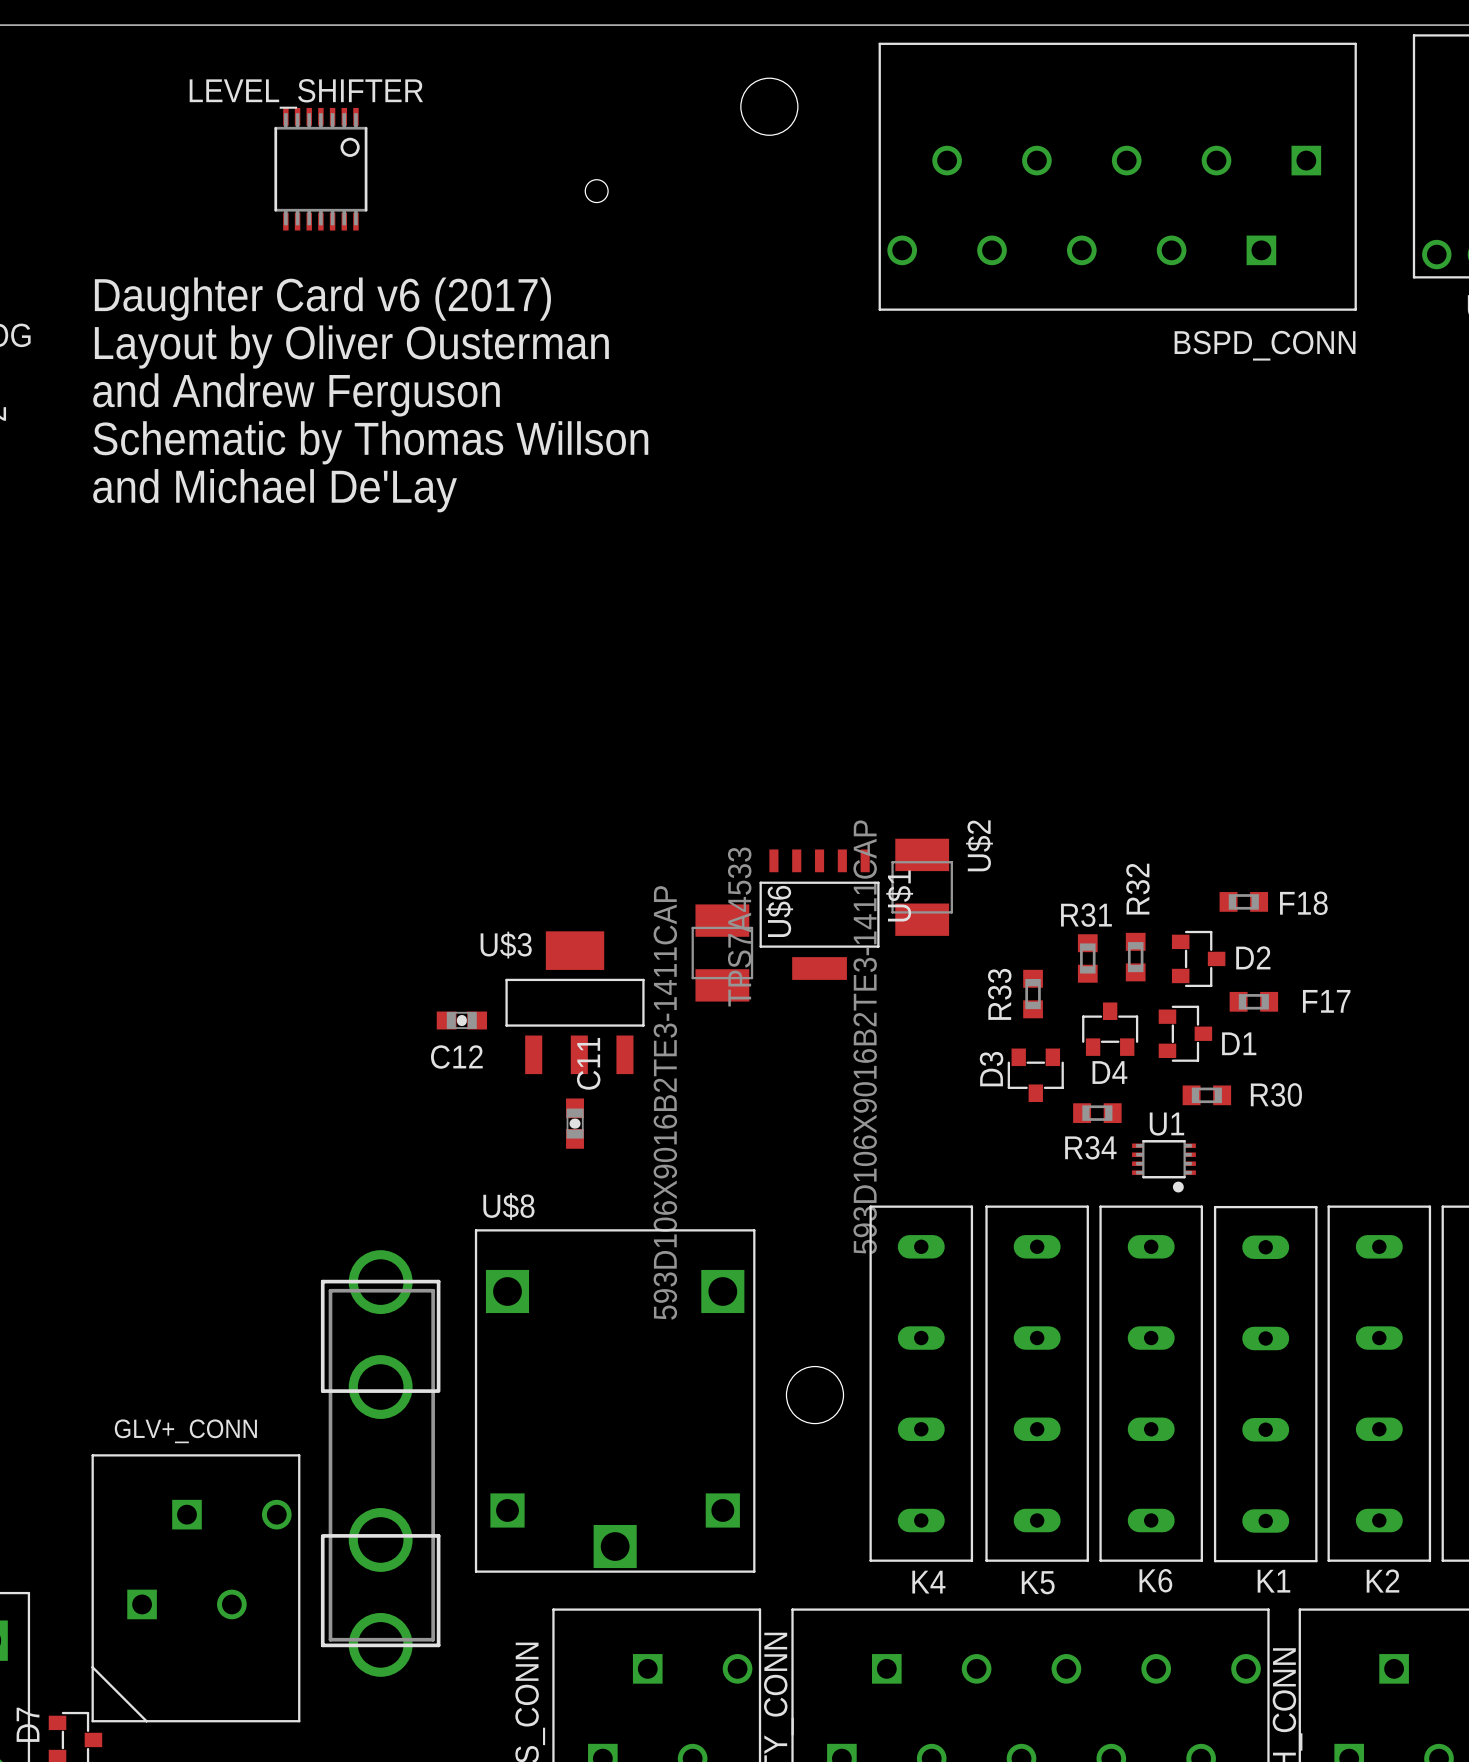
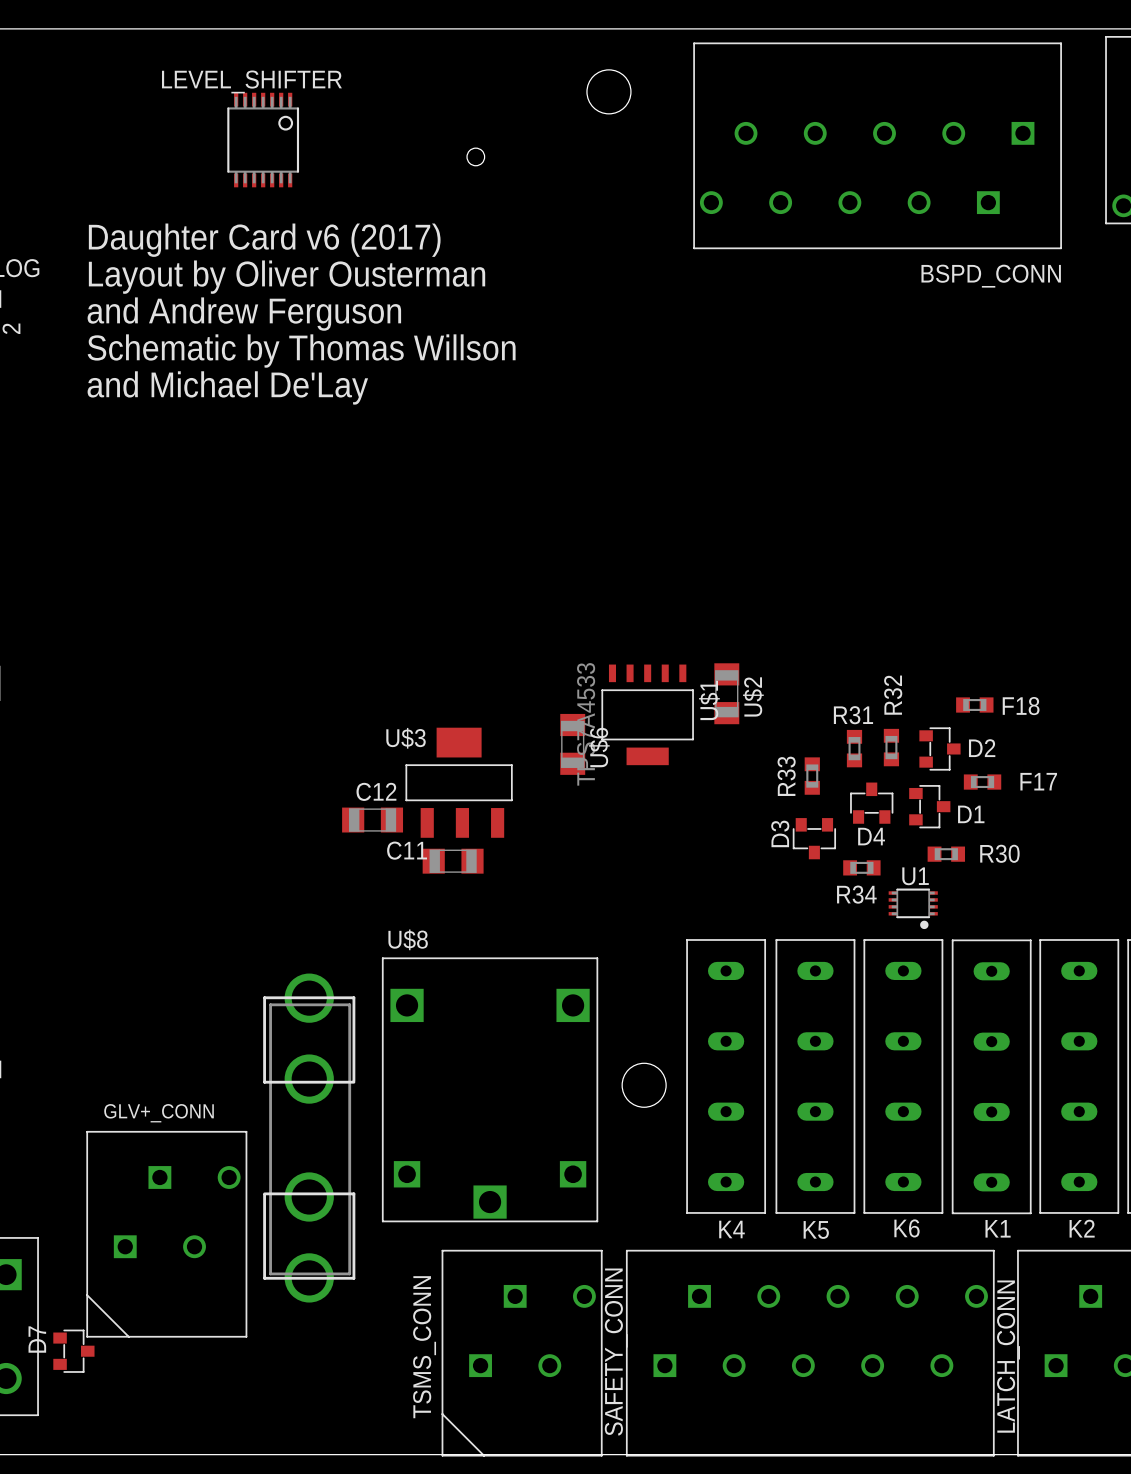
U$2 footprint: [891, 838, 953, 936] -> [714, 663, 740, 725]
U$2 name position: U$2 (979, 845) -> U$2 (753, 696)
U$6 footprint: [691, 904, 754, 1002] -> [560, 713, 586, 775]
U$6 name position: U$6 (779, 911) -> U$6 (599, 747)
C12 footprint: [436, 1011, 488, 1030] -> [342, 807, 404, 833]
U$2 value: 593D106X9016B2TE3-1411CAP (865, 1037) -> none
C12 name position: C12 (456, 1057) -> C12 (376, 791)
C11 name position: C11 (588, 1063) -> C11 (407, 850)
C11 footprint: [566, 1098, 585, 1149] -> [422, 848, 484, 874]
U$6 value: 593D106X9016B2TE3-1411CAP (665, 1102) -> none

